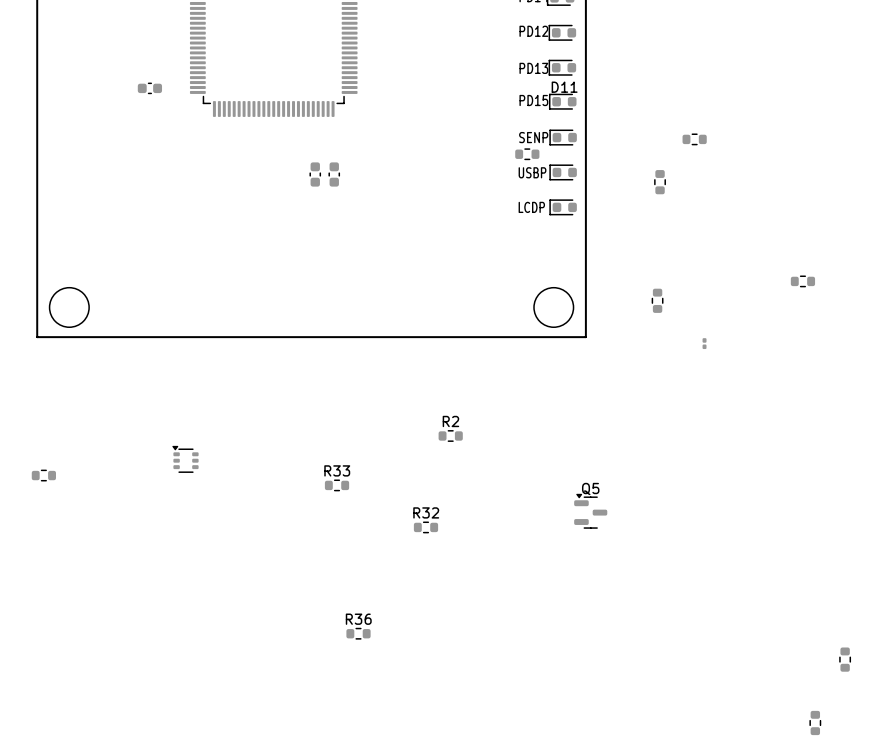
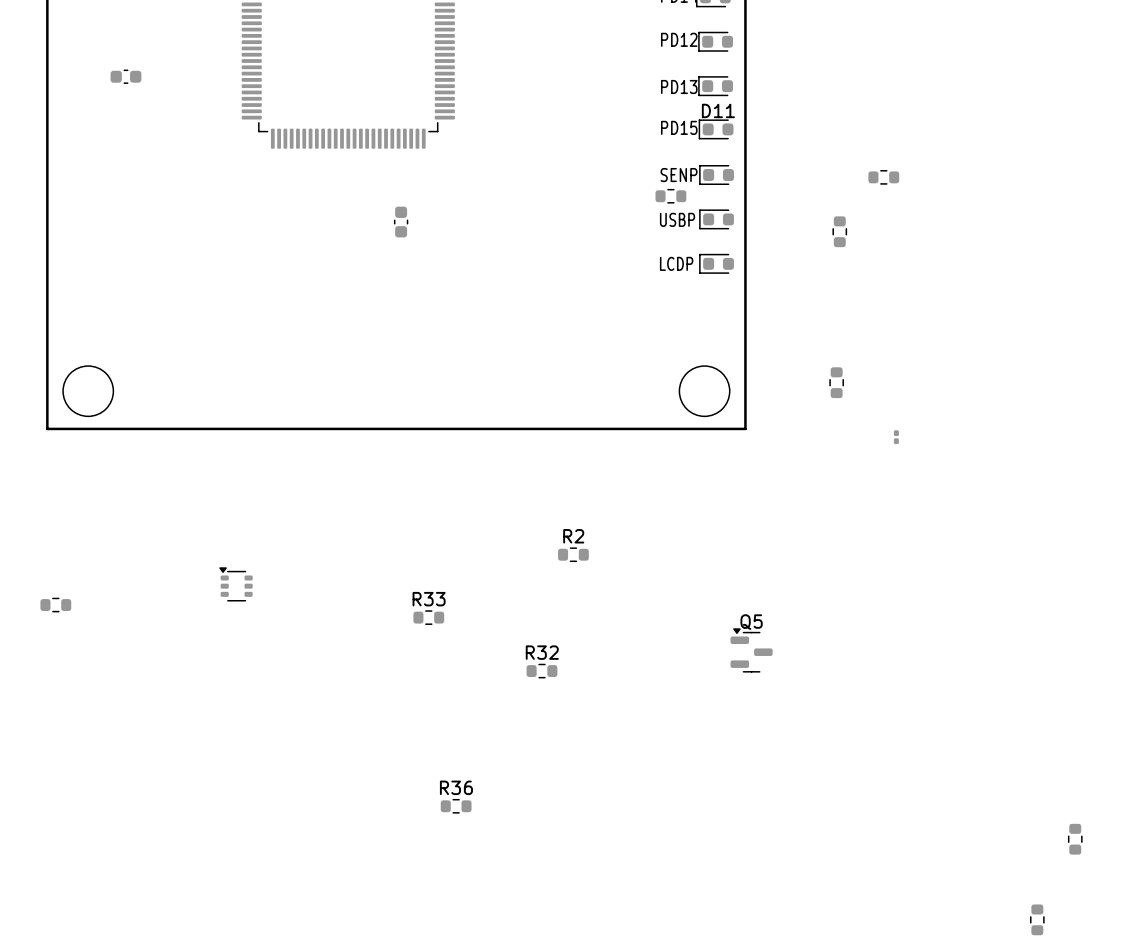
part position: (149, 88) -> (125, 76)
part: (334, 174) -> none
part: (802, 281) -> none

